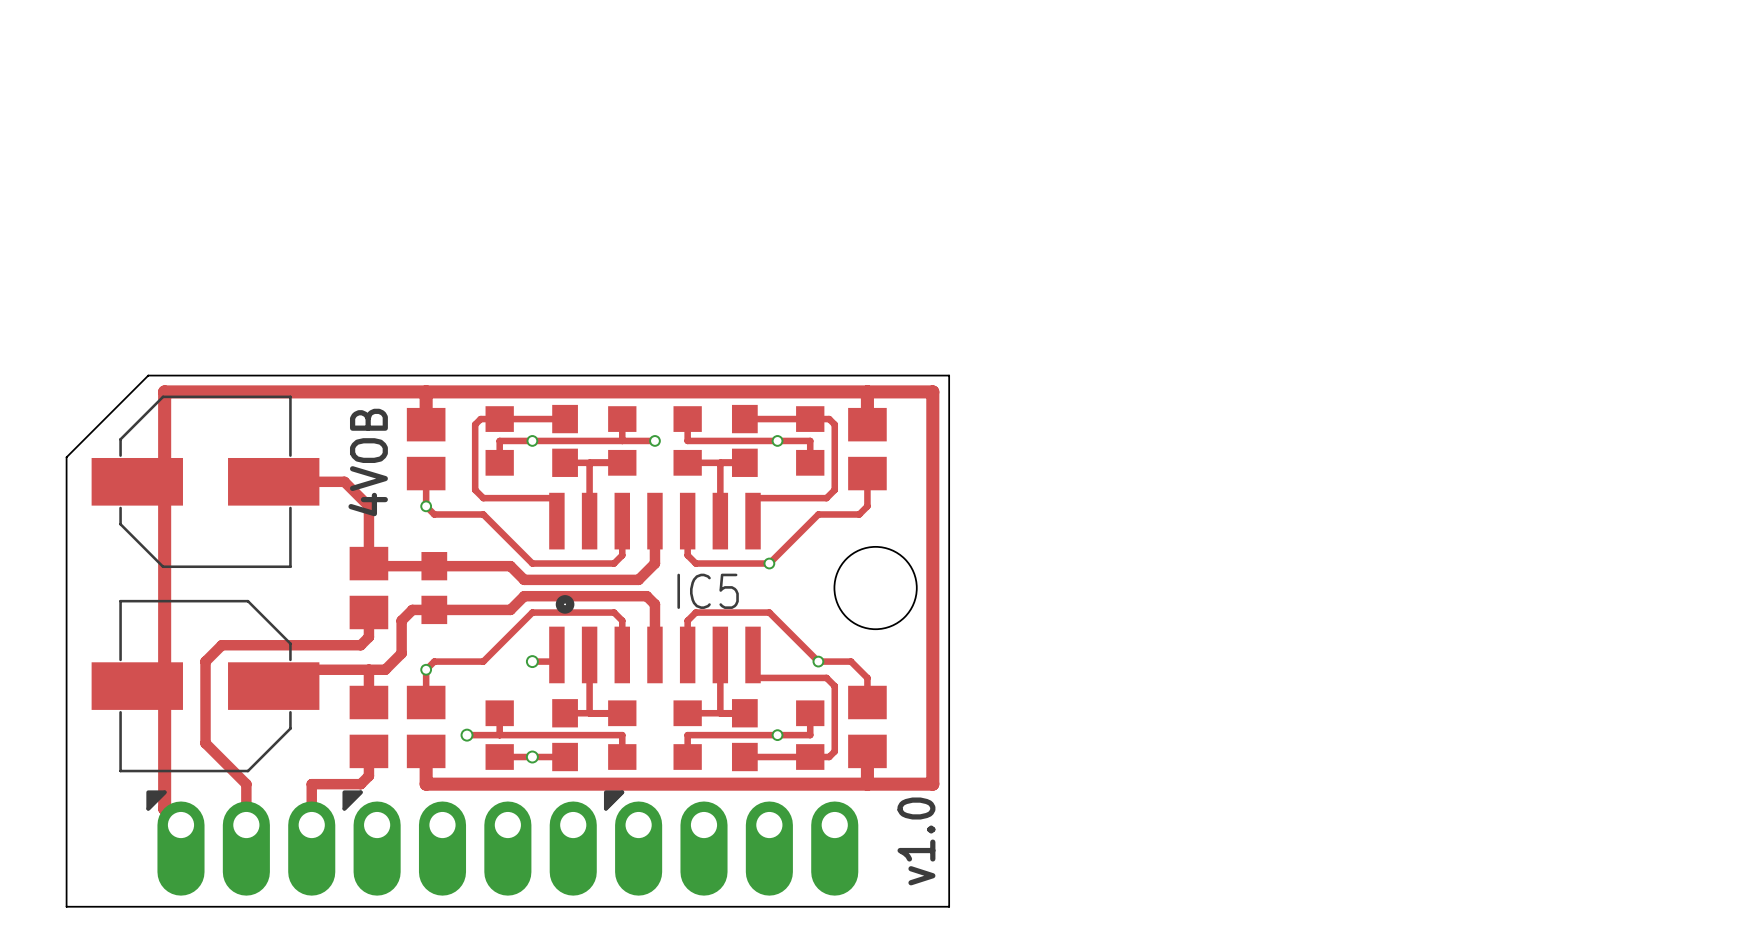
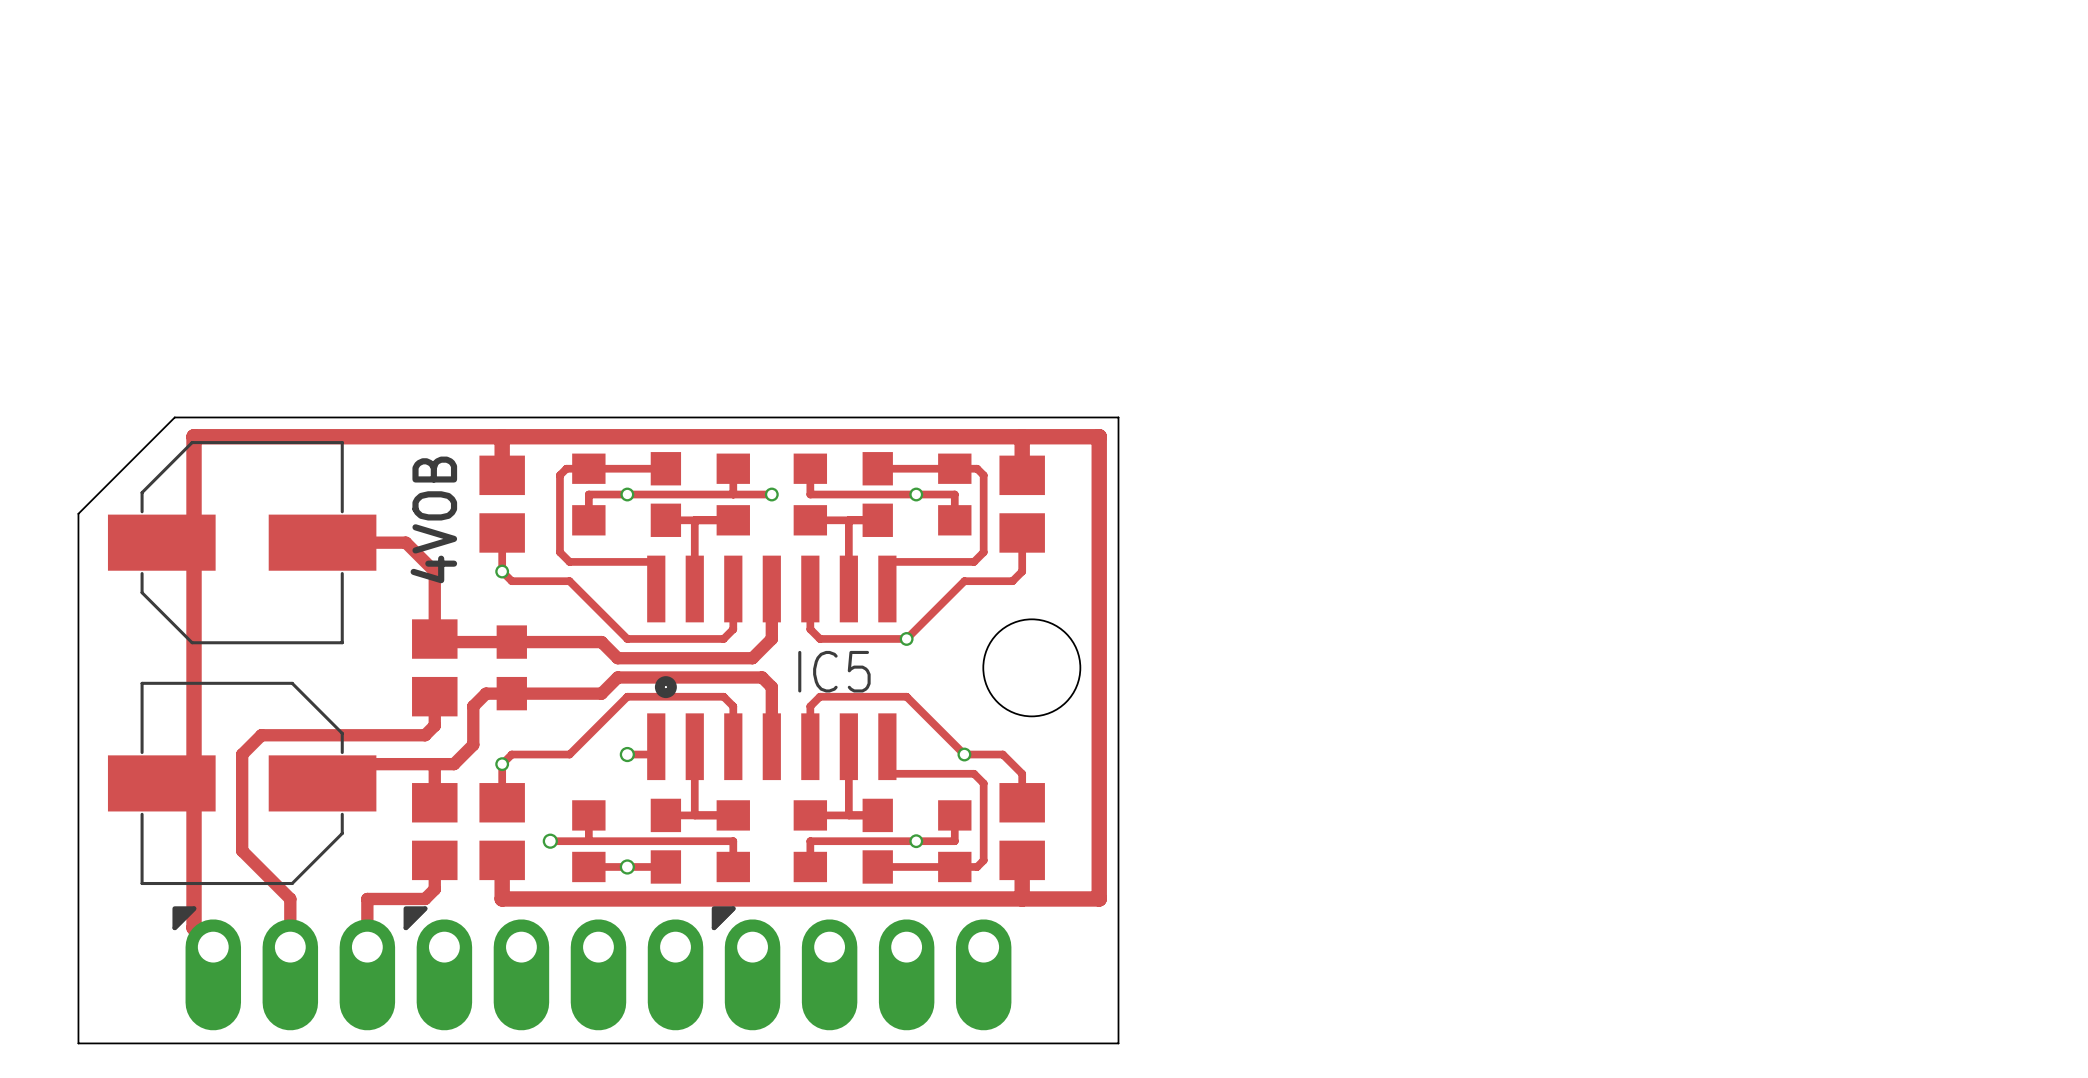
text: v1.0 (916, 841) -> none

